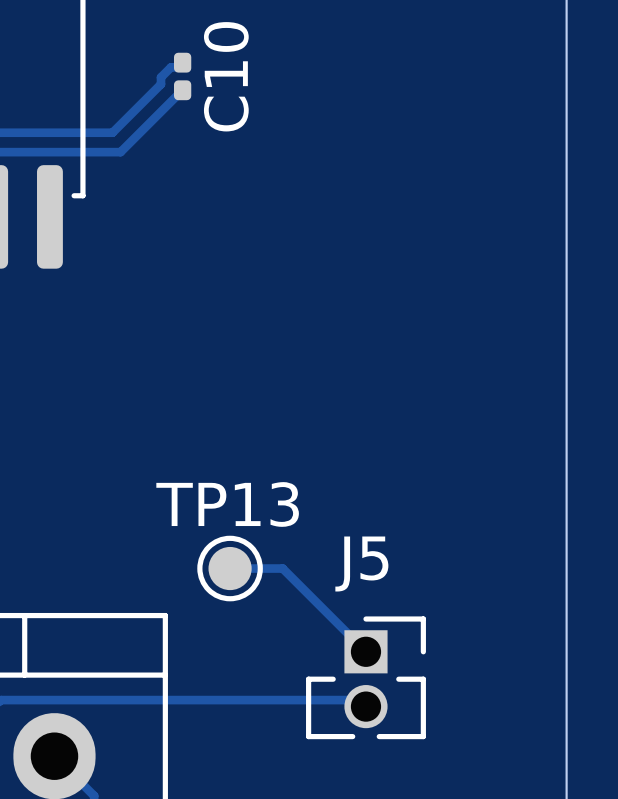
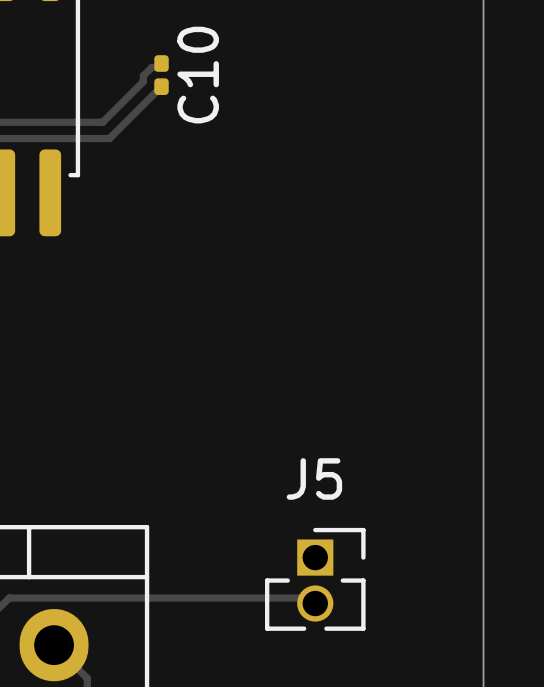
track: (230, 568) (282, 568) (365, 651) -> none
TP13: (230, 568) -> none

